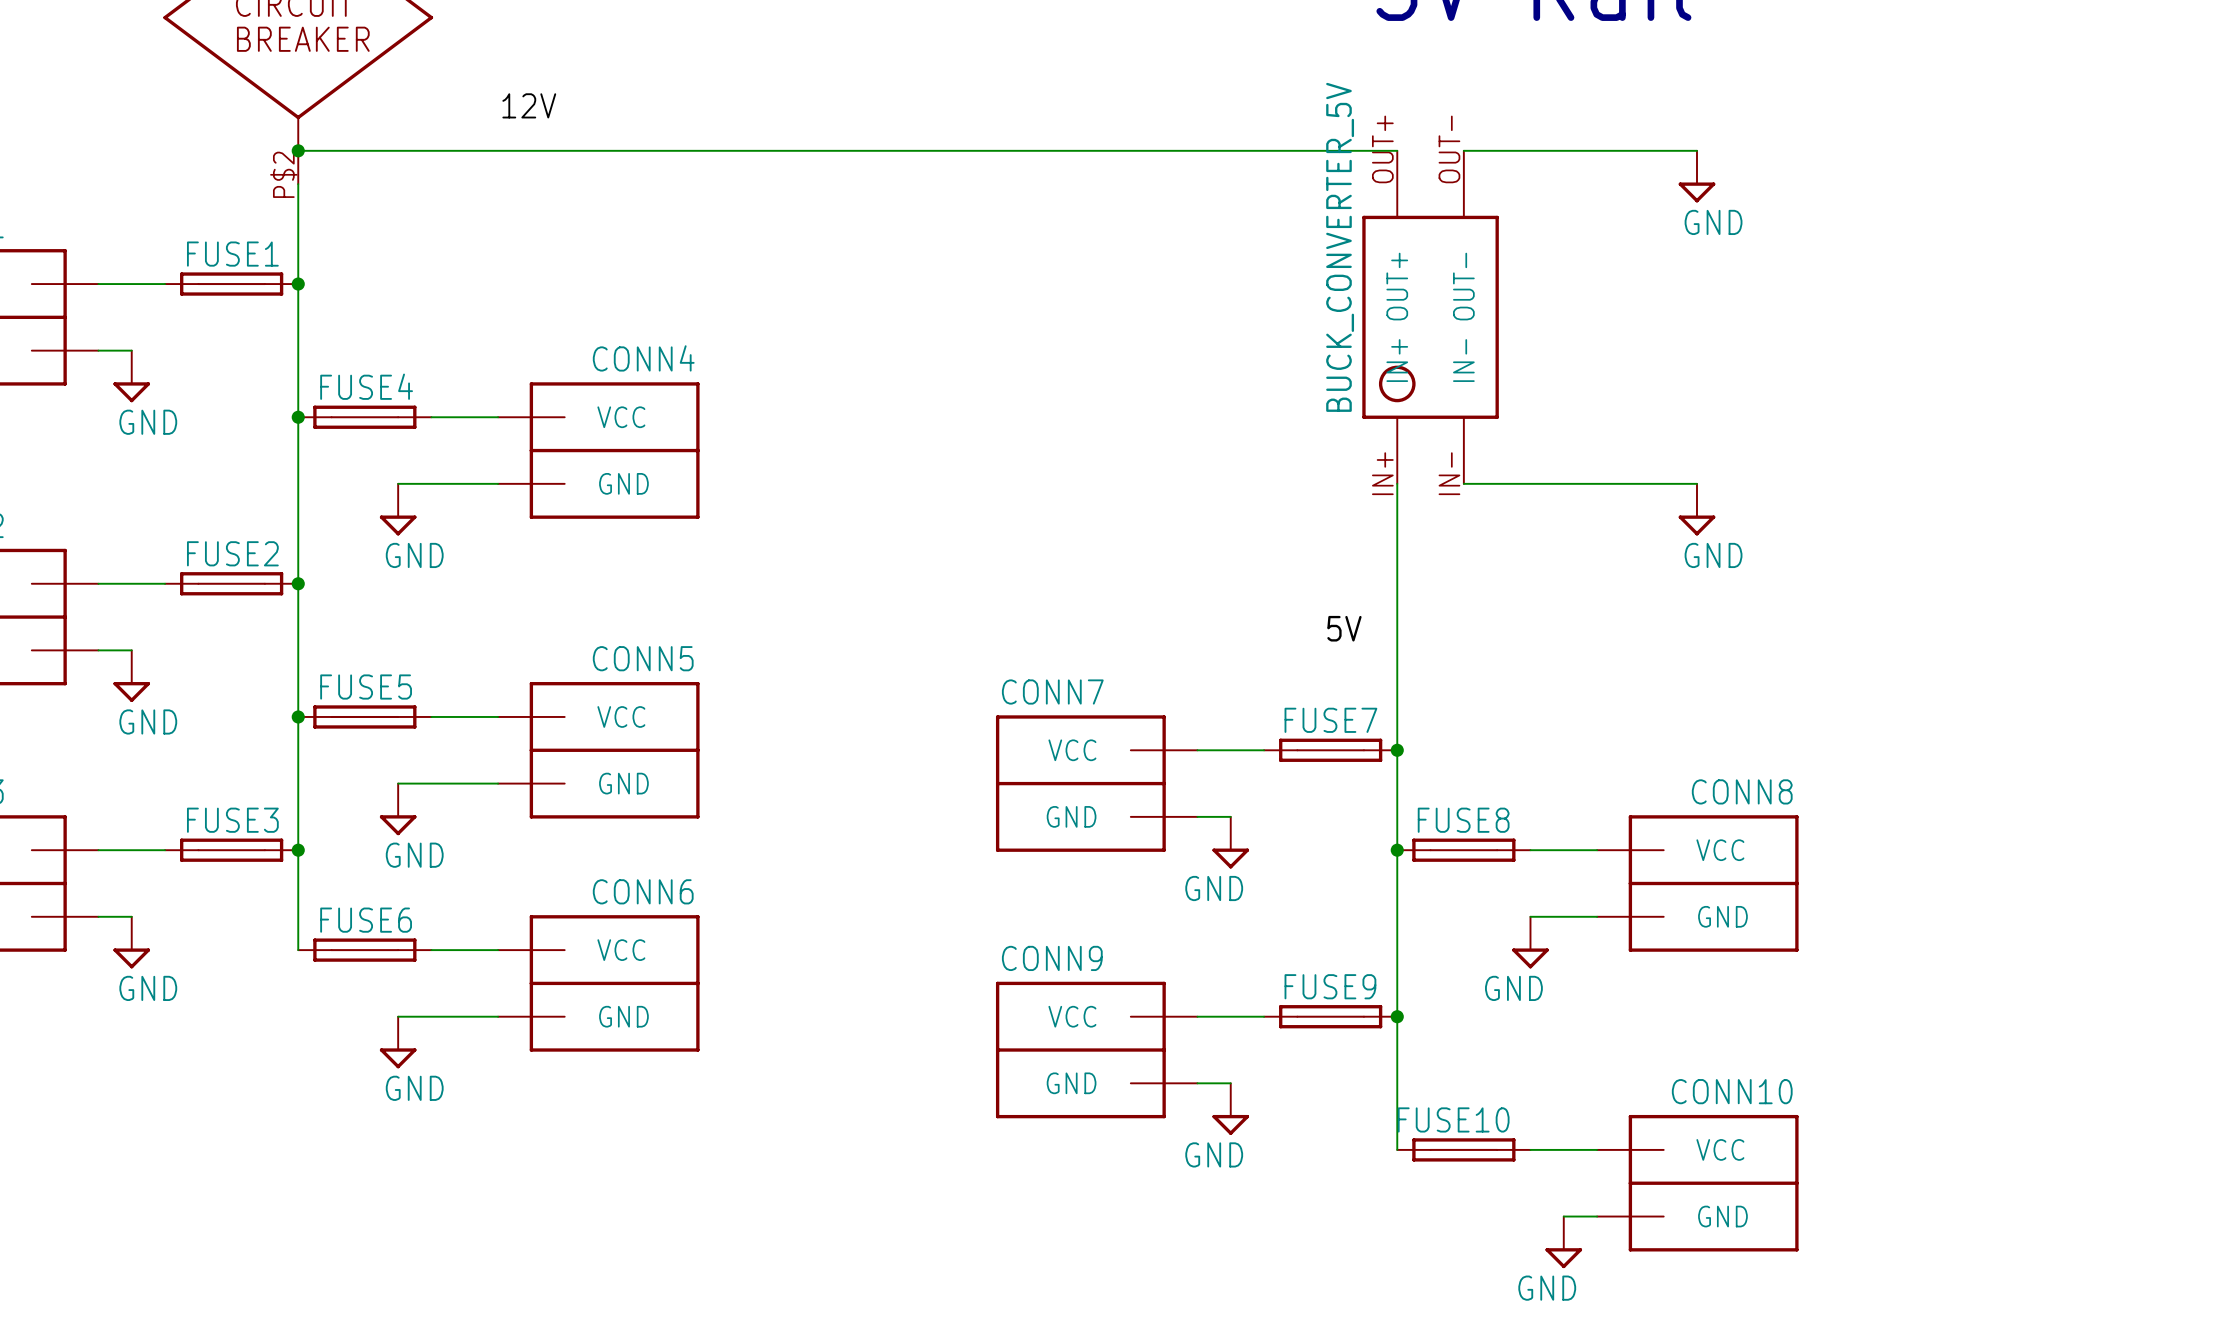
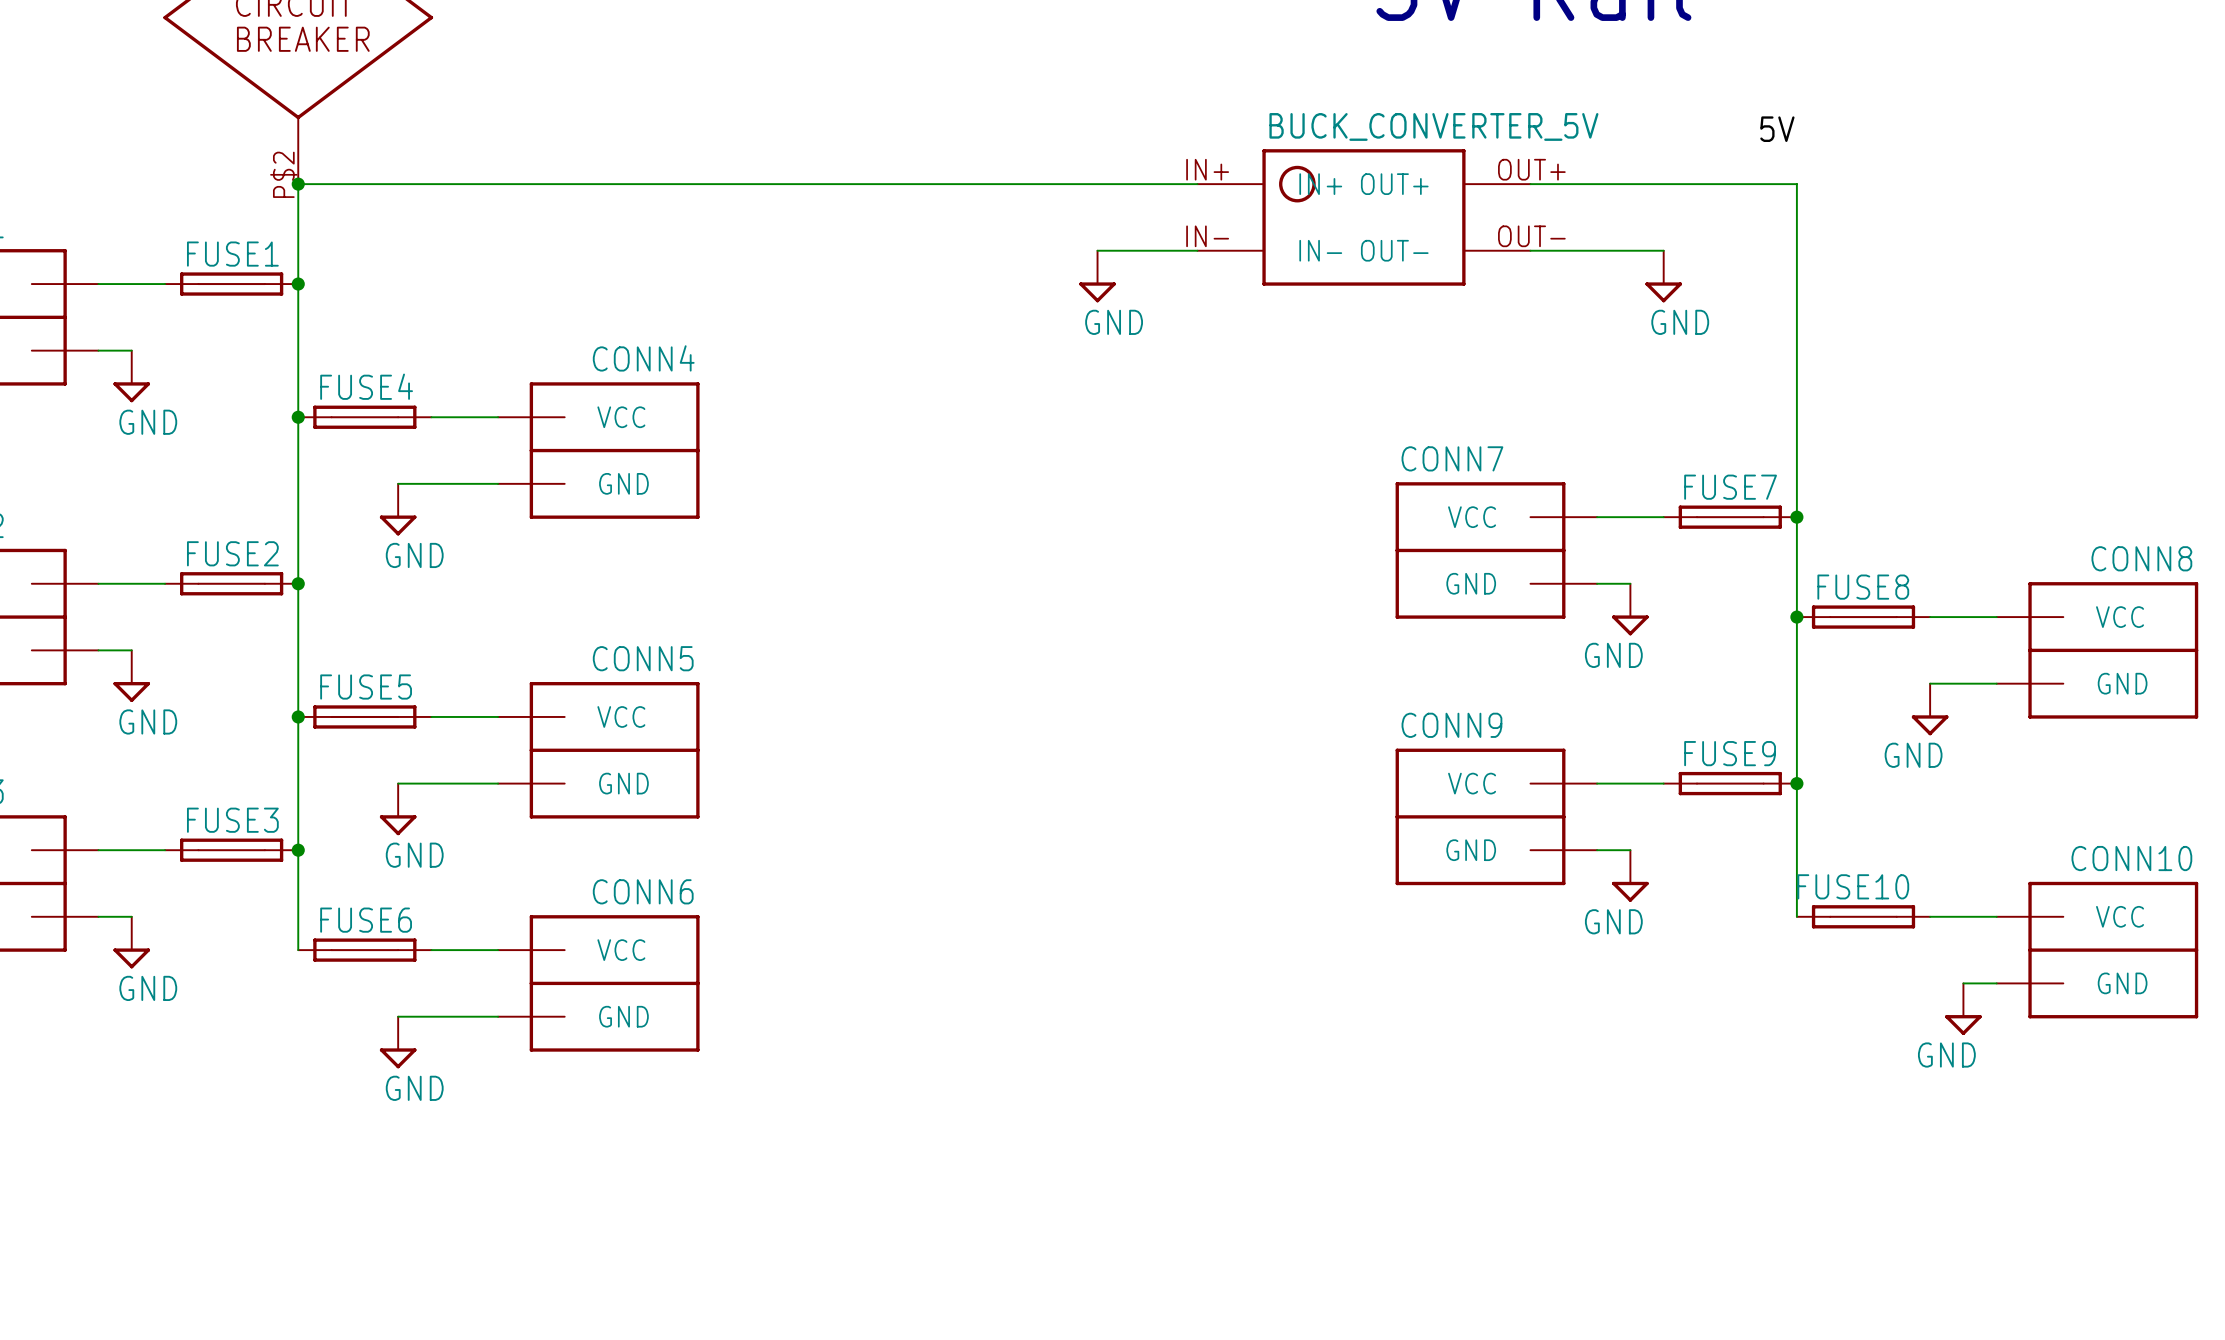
label: 12V (529, 105) -> none
label: none -> 5V (1777, 129)
wire: (298, 150) (1397, 150) -> none
junction position: (298, 150) -> (298, 184)
wire: (1463, 150) (1696, 150) -> none
power symbol position: GND (1696, 176) -> GND (1663, 276)
wire: none -> (298, 184) (1197, 184)
wire: none -> (1530, 184) (1796, 184) (1796, 916)
wire: none -> (1097, 250) (1197, 250)
wire: none -> (1530, 250) (1663, 250)
power symbol: none -> GND (1097, 276)
part rotation: 0° (1430, 317) -> 90° clockwise (1363, 217)
wire: (1397, 483) (1397, 1149) -> none
wire: (1463, 483) (1696, 483) -> none
power symbol: GND (1696, 509) -> none
wire: none -> (1597, 517) (1663, 517)
junction: none -> (1796, 517)
wire: none -> (1597, 583) (1630, 583)
power symbol: none -> GND (1630, 609)
junction: none -> (1796, 617)
wire: none -> (1930, 617) (1996, 617)
label: 5V (1344, 628) -> none
wire: none -> (1930, 683) (1996, 683)
power symbol: none -> GND (1930, 709)
wire: (1197, 750) (1264, 750) -> none
FUSE7 position: (1330, 750) -> (1730, 517)
junction: (1397, 750) -> none
CONN7 position: (1096, 783) -> (1496, 550)
junction: none -> (1796, 783)
wire: (1197, 816) (1230, 816) -> none
power symbol: GND (1230, 842) -> none
junction: (1397, 850) -> none
FUSE8 position: (1463, 850) -> (1863, 617)
CONN8 position: (1697, 883) -> (2097, 650)
wire: (1530, 916) (1597, 916) -> (1597, 783) (1663, 783)
wire: none -> (1930, 916) (1996, 916)
power symbol position: GND (1530, 942) -> GND (1630, 876)
wire: none -> (1963, 983) (1996, 983)
power symbol: none -> GND (1963, 1009)
wire: (1197, 1016) (1264, 1016) -> none
FUSE9 position: (1330, 1016) -> (1730, 783)
junction: (1397, 1016) -> none
CONN9 position: (1096, 1050) -> (1496, 816)
wire: (1197, 1083) (1230, 1083) -> none
power symbol: GND (1230, 1109) -> none
FUSE10 position: (1463, 1149) -> (1863, 916)
wire: (1530, 1149) (1597, 1149) -> none
CONN10 position: (1697, 1183) -> (2097, 950)
wire: (1563, 1216) (1597, 1216) -> none
power symbol: GND (1563, 1242) -> none

